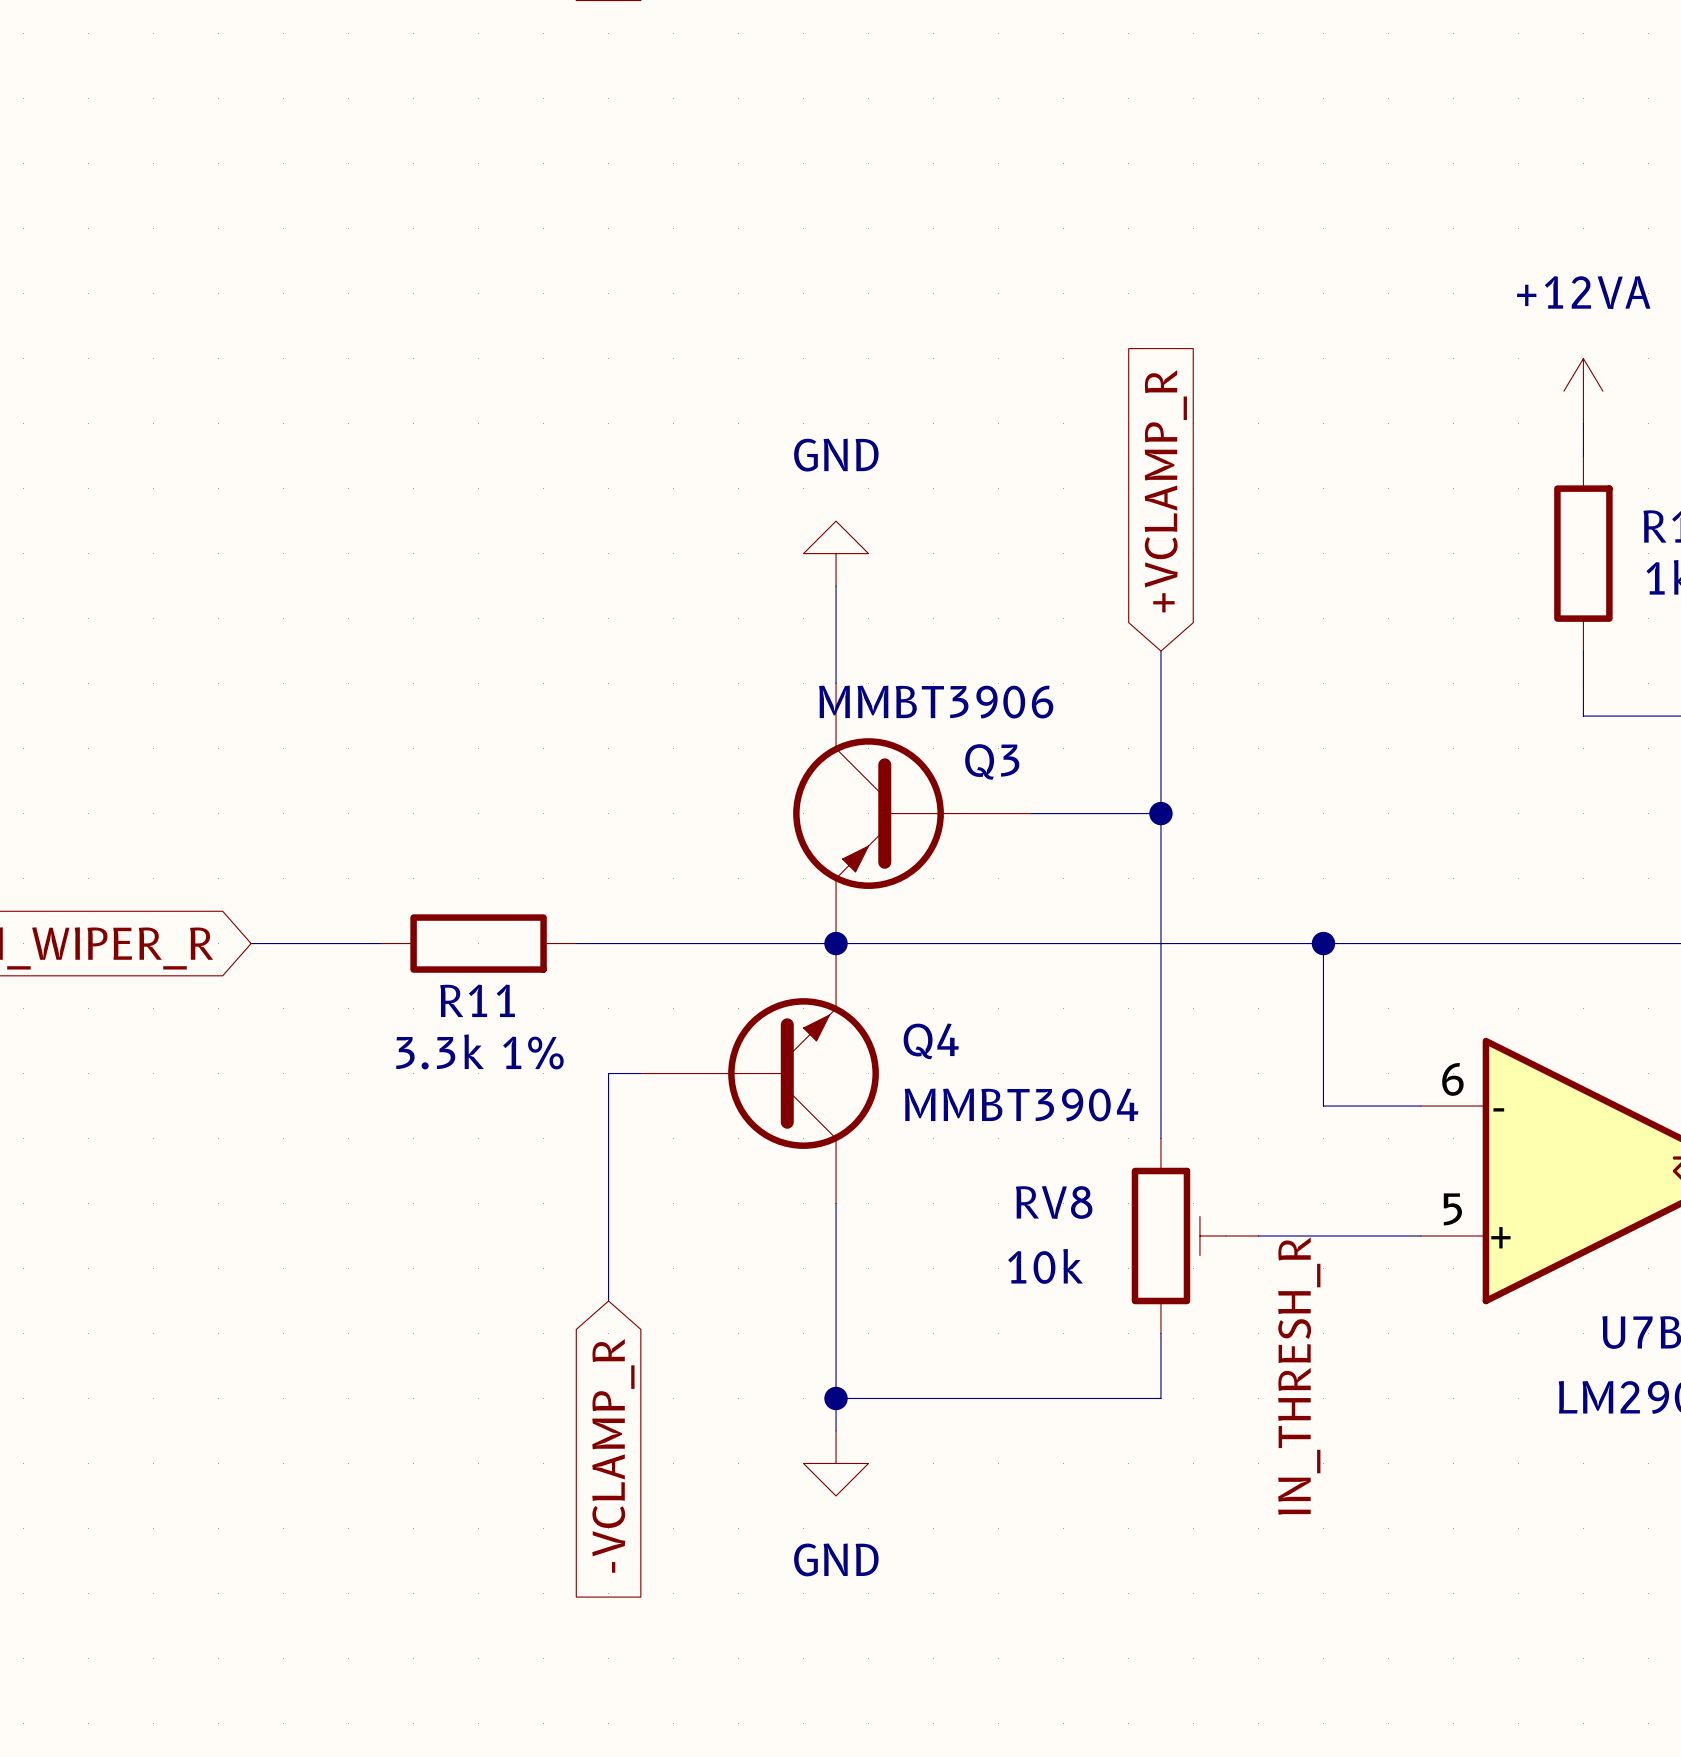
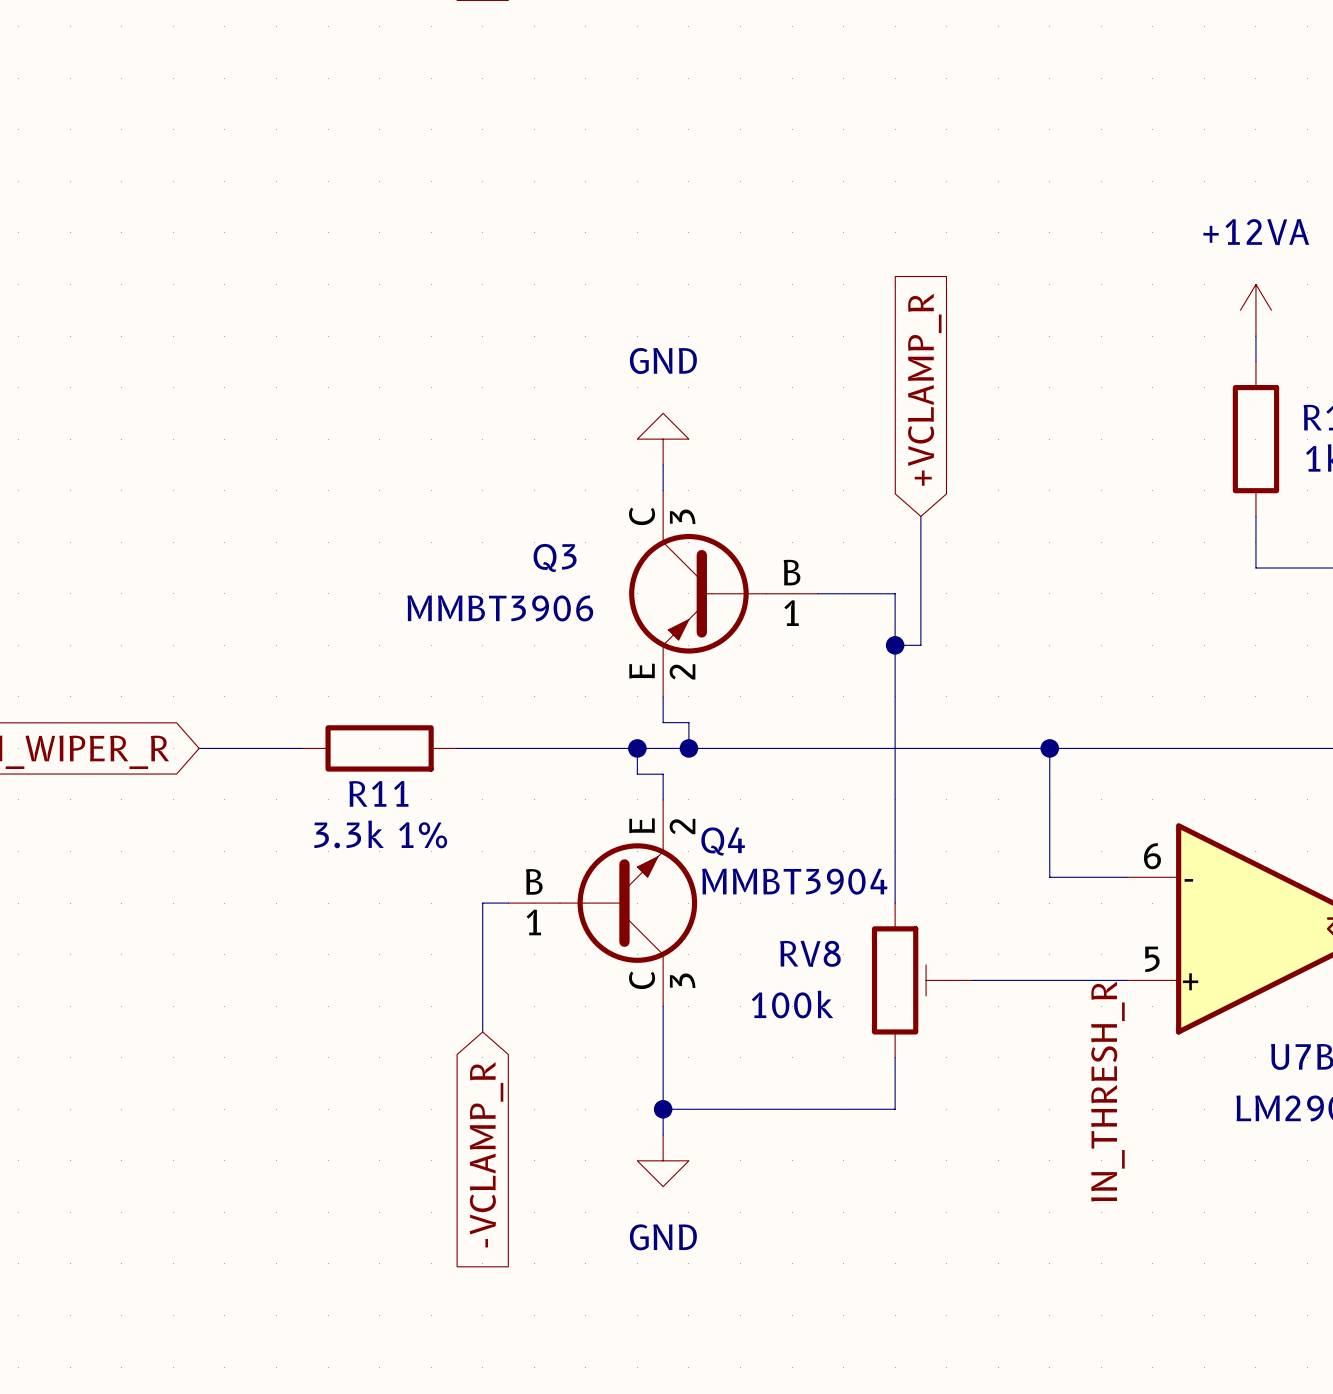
Q3 pin name: none -> C (642, 516)
Q3 pin number: none -> 3 (682, 516)
Q3 value position: MMBT3906 (936, 702) -> MMBT3906 (500, 608)
Q3 pin name: none -> B (792, 572)
wire: none -> (817, 593) (895, 593) (895, 903)
Q3 name position: Q3 (992, 761) -> Q3 (555, 557)
Q3 pin number: none -> 1 (791, 613)
Q3 position: (912, 813) -> (723, 593)
wire: (1030, 813) (1128, 813) -> none
wire: (1160, 813) (1160, 1138) -> none
junction position: (1160, 813) -> (895, 645)
Q3 pin name: none -> E (642, 671)
Q3 pin number: none -> 2 (682, 671)
wire: none -> (663, 696) (663, 722) (688, 722) (688, 748)
wire: none -> (637, 748) (637, 774) (663, 774) (663, 799)
junction: none -> (637, 748)
junction: (836, 943) -> none
junction: none -> (688, 748)
Q4 pin name: none -> E (642, 825)
Q4 name position: Q4 (931, 1041) -> Q4 (723, 841)
Q4 pin number: none -> 2 (682, 826)
wire: (641, 1073) (608, 1073) (608, 1138) -> (508, 903) (482, 903)
Q4 position: (759, 1073) -> (602, 903)
Q4 value position: MMBT3904 (1021, 1104) -> MMBT3904 (794, 881)
Q4 pin name: none -> B (534, 881)
Q4 pin number: none -> 1 (533, 922)
Q4 pin name: none -> C (642, 980)
Q4 pin number: none -> 3 (682, 980)
RV8 position: (1195, 1236) -> (922, 980)
RV8 value: 10k (1045, 1266) -> 100k (792, 1004)
wire: (1160, 1333) (1160, 1398) (1128, 1398) -> (895, 1057) (895, 1109)
label position: IN_THRESH_R (1299, 1376) -> IN_THRESH_R (1107, 1091)

